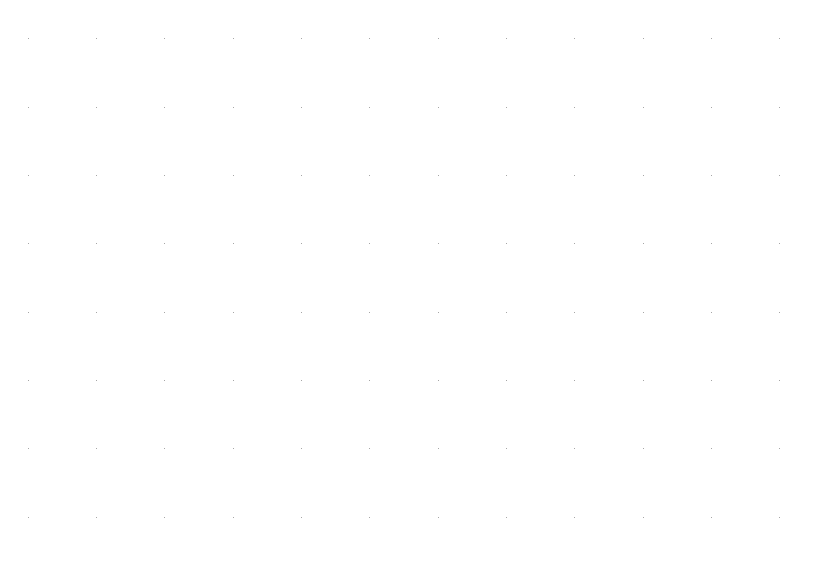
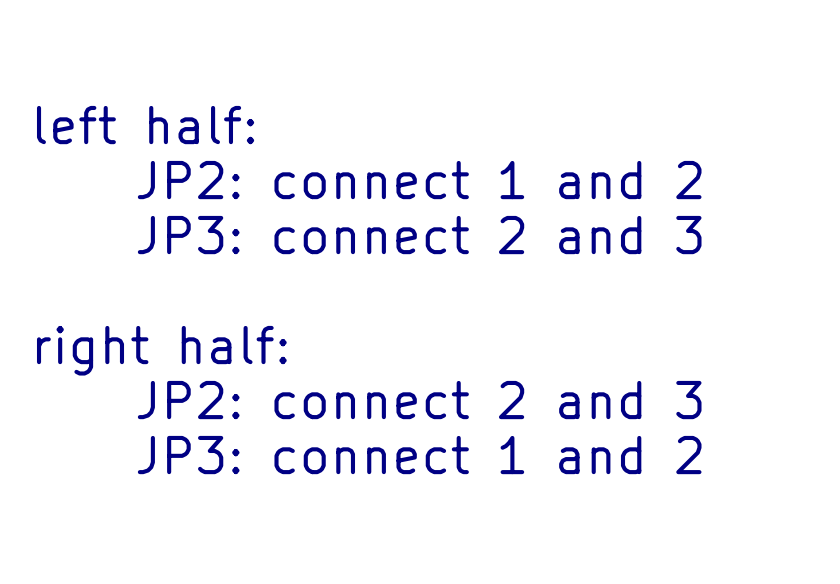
text: none -> left half: (145, 125)
text: none -> JP2: connect 1 and 2 (419, 180)
text: none -> JP3: connect 2 and 3 (419, 235)
text: none -> right half: (161, 350)
text: none -> JP2: connect 2 and 3 (419, 400)
text: none -> JP3: connect 1 and 2 (419, 455)

